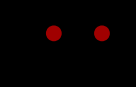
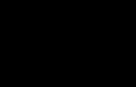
part: (53, 33) -> none
part: (101, 33) -> none

